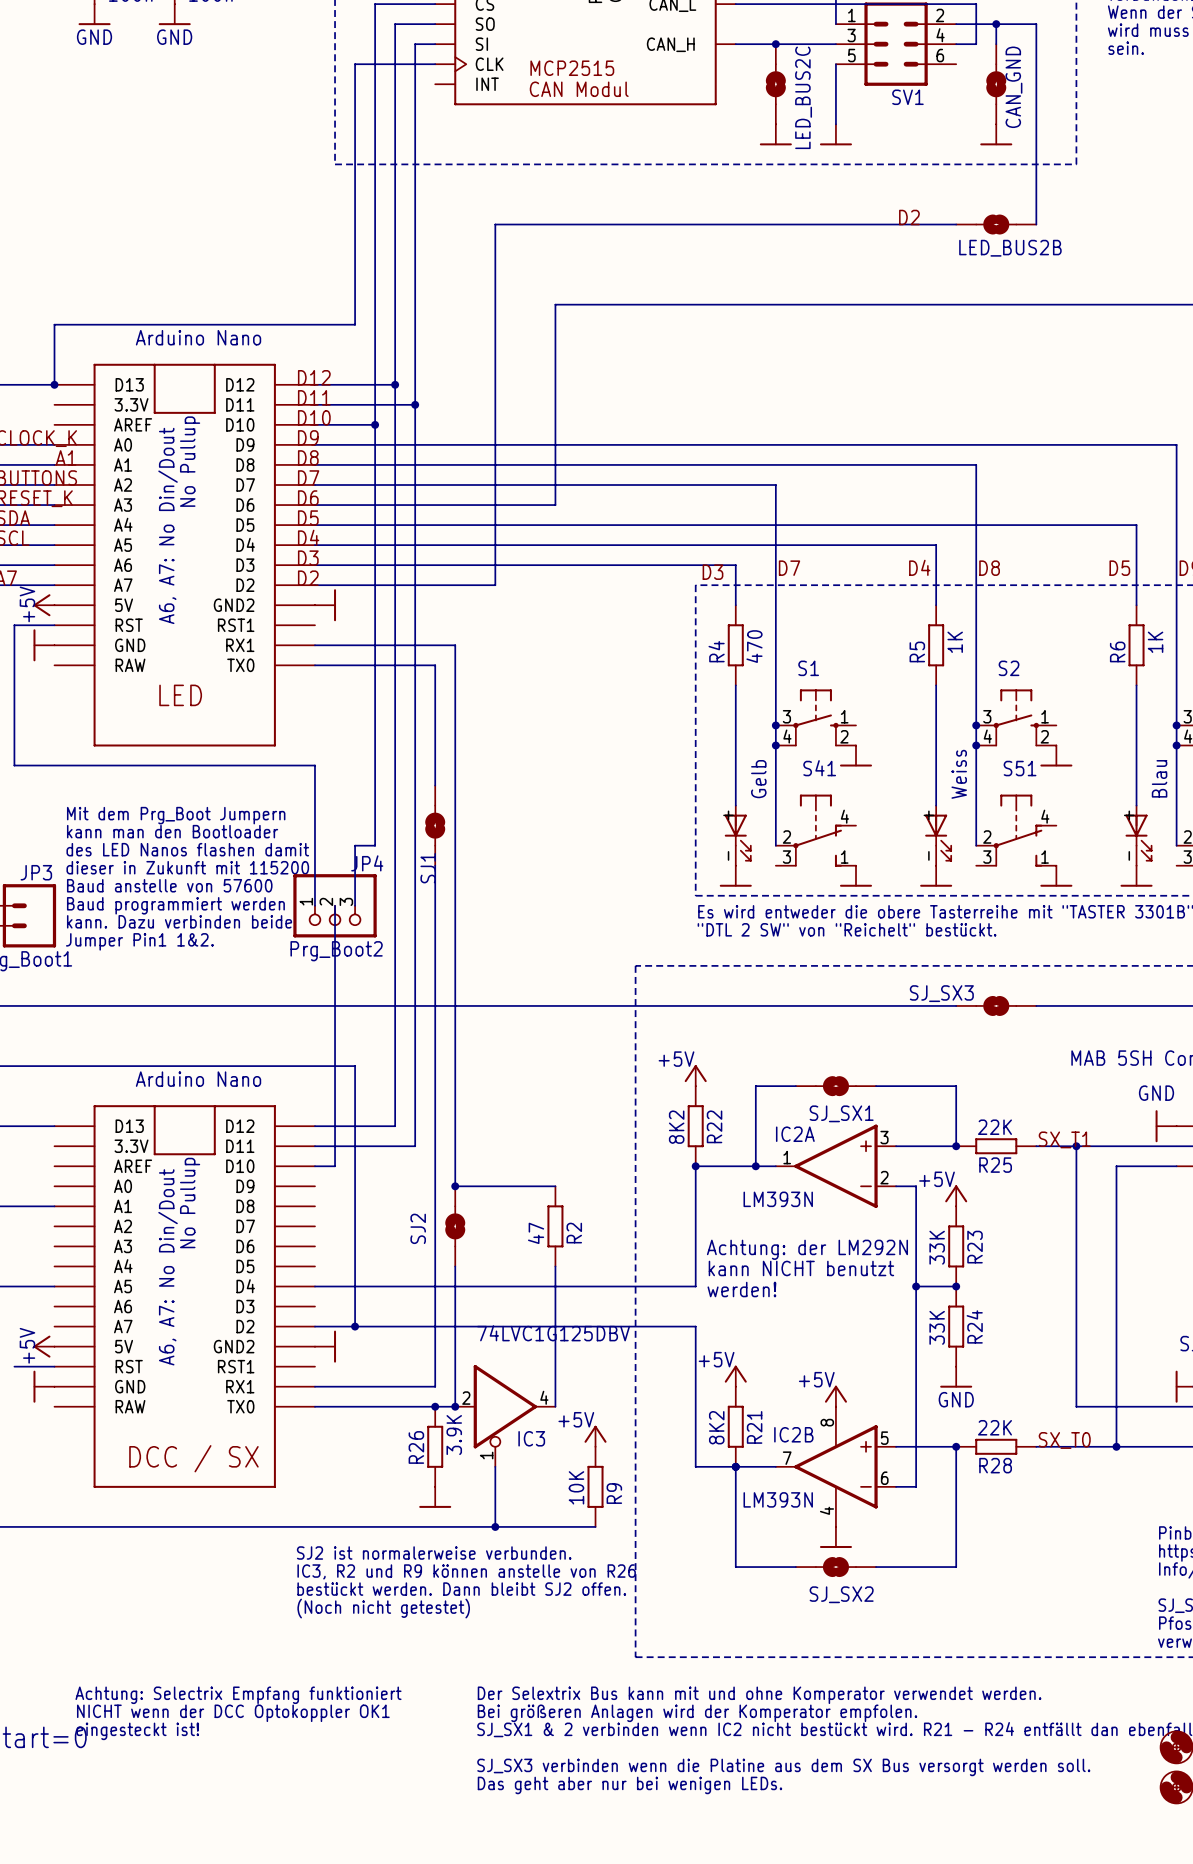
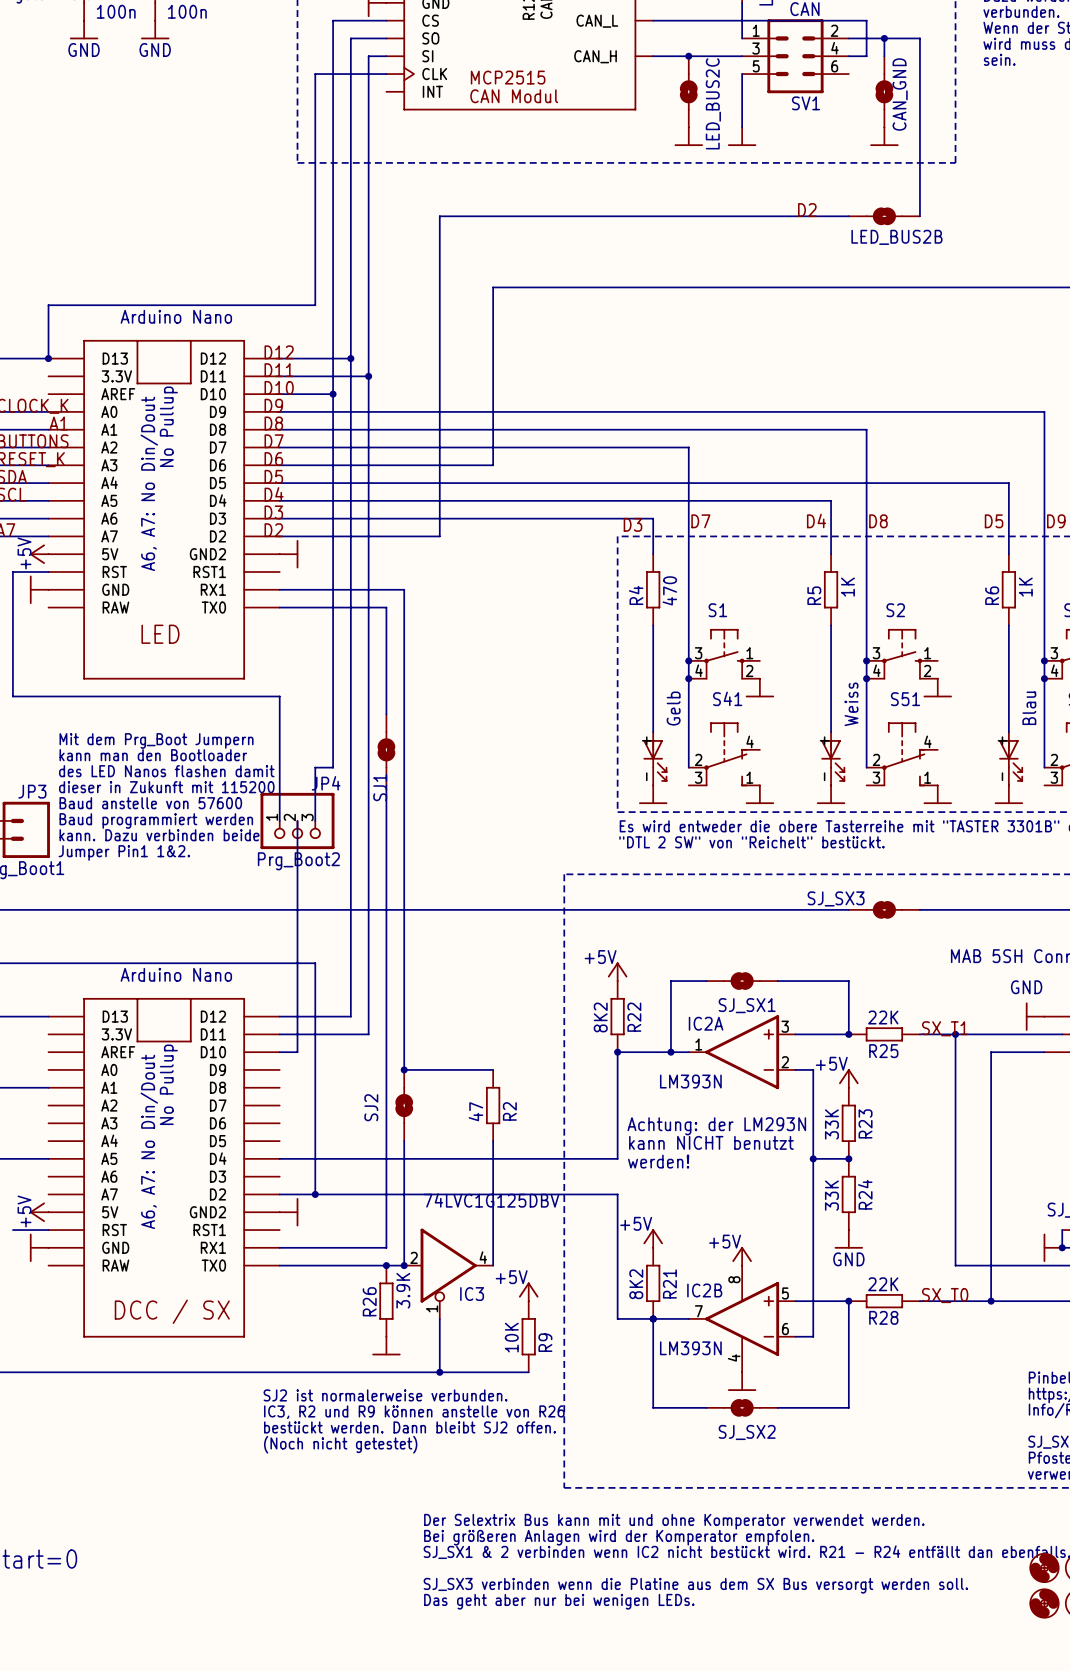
text: Achtung: der LM292N (807, 1249) -> Achtung: der LM293N (716, 1126)
text: Achtung: Selectrix Empfang funktioniert (238, 1695) -> none
text: NICHT wenn der DCC Optokoppler OK1 (233, 1713) -> none
text: eingesteckt ist! (137, 1731) -> none

